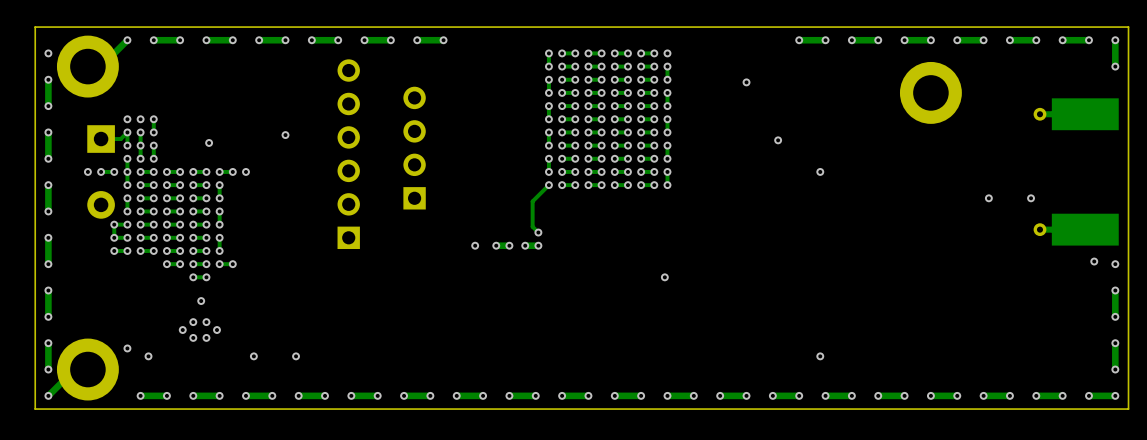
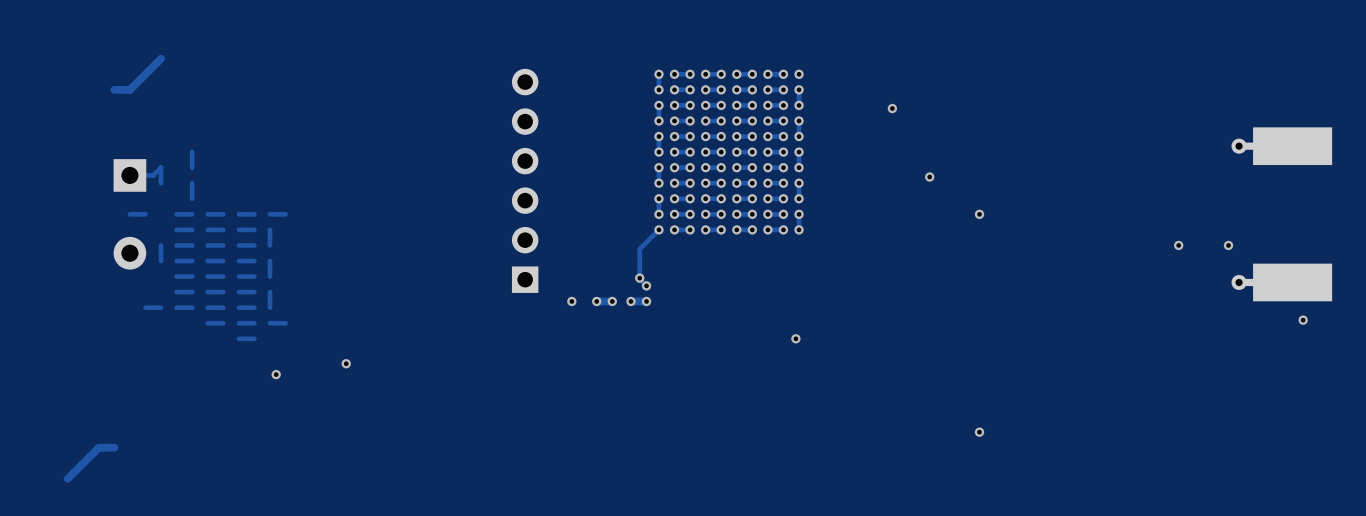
board edge: (1128, 27) (35, 27) (35, 409) (1128, 409) (1128, 27) -> none
via: (127, 40) -> none
via: (153, 40) -> none
track: (180, 40) (153, 40) -> none
via: (180, 40) -> none
via: (206, 40) -> none
track: (232, 40) (206, 40) -> none
via: (232, 40) -> none
via: (259, 40) -> none
track: (285, 40) (259, 40) -> none
via: (285, 40) -> none
via: (311, 40) -> none
track: (338, 40) (311, 40) -> none
via: (338, 40) -> none
via: (364, 40) -> none
track: (390, 40) (364, 40) -> none
via: (390, 40) -> none
via: (417, 40) -> none
track: (443, 40) (417, 40) -> none
via: (443, 40) -> none
via: (799, 40) -> none
track: (825, 40) (799, 40) -> none
via: (825, 40) -> none
via: (851, 40) -> none
track: (878, 40) (851, 40) -> none
via: (878, 40) -> none
via: (904, 40) -> none
track: (930, 40) (904, 40) -> none
via: (930, 40) -> none
via: (957, 40) -> none
track: (983, 40) (957, 40) -> none
via: (983, 40) -> none
via: (1009, 40) -> none
track: (1036, 40) (1009, 40) -> none
via: (1036, 40) -> none
via: (1062, 40) -> none
track: (1088, 40) (1062, 40) -> none
via: (1088, 40) -> none
track: (1115, 40) (1115, 66) -> none
via: (1115, 40) -> none
via: (48, 53) -> none
part: (87, 66) -> none
via: (1115, 66) -> none
track: (48, 79) (48, 106) -> none
via: (48, 79) -> none
part: (930, 92) -> none
via: (48, 106) -> none
via: (127, 119) -> none
via: (140, 119) -> none
via: (153, 119) -> none
track: (48, 132) (48, 158) -> none
via: (48, 132) -> none
via: (127, 132) -> none
track: (140, 132) (140, 158) -> none
via: (140, 132) -> none
via: (153, 132) -> none
via: (285, 135) -> none
via: (209, 142) -> none
via: (127, 145) -> none
via: (140, 145) -> none
via: (153, 145) -> none
part: (414, 148) -> none
part position: (348, 154) -> (525, 180)
via: (48, 158) -> none
track: (127, 158) (127, 185) -> none
via: (127, 158) -> none
via: (140, 158) -> none
via: (153, 158) -> none
via: (87, 171) -> none
via: (101, 171) -> none
via: (114, 171) -> none
via: (127, 171) -> none
via: (140, 171) -> none
via: (153, 171) -> none
via: (166, 171) -> none
via: (180, 171) -> none
via: (193, 171) -> none
via: (206, 171) -> none
via: (219, 171) -> none
via: (232, 171) -> none
via: (245, 171) -> none
track: (48, 185) (48, 211) -> none
via: (48, 185) -> none
via: (127, 185) -> none
via: (140, 185) -> none
via: (153, 185) -> none
via: (166, 185) -> none
via: (180, 185) -> none
via: (193, 185) -> none
via: (206, 185) -> none
via: (219, 185) -> none
via: (127, 198) -> none
via: (140, 198) -> none
via: (153, 198) -> none
via: (166, 198) -> none
via: (180, 198) -> none
via: (193, 198) -> none
via: (206, 198) -> none
via: (219, 198) -> none
via: (48, 211) -> none
via: (127, 211) -> none
via: (140, 211) -> none
via: (153, 211) -> none
via: (166, 211) -> none
via: (180, 211) -> none
via: (193, 211) -> none
via: (206, 211) -> none
via: (219, 211) -> none
via: (114, 224) -> none
track: (127, 224) (114, 224) (114, 237) (127, 237) -> none
via: (127, 224) -> none
via: (140, 224) -> none
via: (153, 224) -> none
via: (166, 224) -> none
via: (180, 224) -> none
via: (193, 224) -> none
via: (206, 224) -> none
via: (219, 224) -> none
via: none -> (639, 278)
track: (48, 237) (48, 264) -> none
via: (48, 237) -> none
via: (114, 237) -> none
via: (127, 237) -> none
via: (140, 237) -> none
via: (153, 237) -> none
via: (166, 237) -> none
via: (180, 237) -> none
via: (193, 237) -> none
via: (206, 237) -> none
via: (219, 237) -> none
via: (114, 250) -> none
via: (127, 250) -> none
via: (140, 250) -> none
via: (153, 250) -> none
via: (166, 250) -> none
via: (180, 250) -> none
via: (193, 250) -> none
via: (206, 250) -> none
via: (219, 250) -> none
via: (48, 264) -> none
via: (166, 264) -> none
via: (180, 264) -> none
via: (193, 264) -> none
via: (206, 264) -> none
via: (219, 264) -> none
via: (232, 264) -> none
via: (1115, 264) -> none
via: (193, 277) -> none
via: (206, 277) -> none
track: (48, 290) (48, 316) -> none
via: (48, 290) -> none
track: (1115, 290) (1115, 316) -> none
via: (1115, 290) -> none
via: none -> (346, 363)
via: (201, 301) -> none
via: none -> (276, 374)
via: (48, 316) -> none
via: (1115, 316) -> none
via: (193, 322) -> none
via: (206, 322) -> none
via: (182, 330) -> none
via: (217, 330) -> none
via: (193, 337) -> none
via: (206, 337) -> none
track: (48, 343) (48, 369) -> none
via: (48, 343) -> none
track: (1115, 343) (1115, 369) -> none
via: (1115, 343) -> none
via: (127, 348) -> none
via: (148, 356) -> none
via: (253, 356) -> none
via: (296, 356) -> none
via: (48, 369) -> none
part: (87, 369) -> none
via: (1115, 369) -> none
via: (48, 395) -> none
via: (140, 395) -> none
track: (166, 395) (140, 395) -> none
via: (166, 395) -> none
via: (193, 395) -> none
track: (219, 395) (193, 395) -> none
via: (219, 395) -> none
via: (245, 395) -> none
track: (272, 395) (245, 395) -> none
via: (272, 395) -> none
via: (298, 395) -> none
track: (325, 395) (298, 395) -> none
via: (325, 395) -> none
via: (351, 395) -> none
track: (377, 395) (351, 395) -> none
via: (377, 395) -> none
via: (404, 395) -> none
track: (430, 395) (404, 395) -> none
via: (430, 395) -> none
via: (456, 395) -> none
track: (483, 395) (456, 395) -> none
via: (483, 395) -> none
via: (509, 395) -> none
track: (535, 395) (509, 395) -> none
via: (535, 395) -> none
via: (562, 395) -> none
track: (588, 395) (562, 395) -> none
via: (588, 395) -> none
via: (614, 395) -> none
track: (641, 395) (614, 395) -> none
via: (641, 395) -> none
via: (667, 395) -> none
track: (693, 395) (667, 395) -> none
via: (693, 395) -> none
via: (720, 395) -> none
track: (746, 395) (720, 395) -> none
via: (746, 395) -> none
via: (772, 395) -> none
track: (799, 395) (772, 395) -> none
via: (799, 395) -> none
via: (825, 395) -> none
track: (851, 395) (825, 395) -> none
via: (851, 395) -> none
via: (878, 395) -> none
track: (904, 395) (878, 395) -> none
via: (904, 395) -> none
via: (930, 395) -> none
track: (957, 395) (930, 395) -> none
via: (957, 395) -> none
via: (983, 395) -> none
track: (1009, 395) (983, 395) -> none
via: (1009, 395) -> none
via: (1036, 395) -> none
track: (1062, 395) (1036, 395) -> none
via: (1062, 395) -> none
via: (1088, 395) -> none
track: (1115, 395) (1088, 395) -> none
via: (1115, 395) -> none

